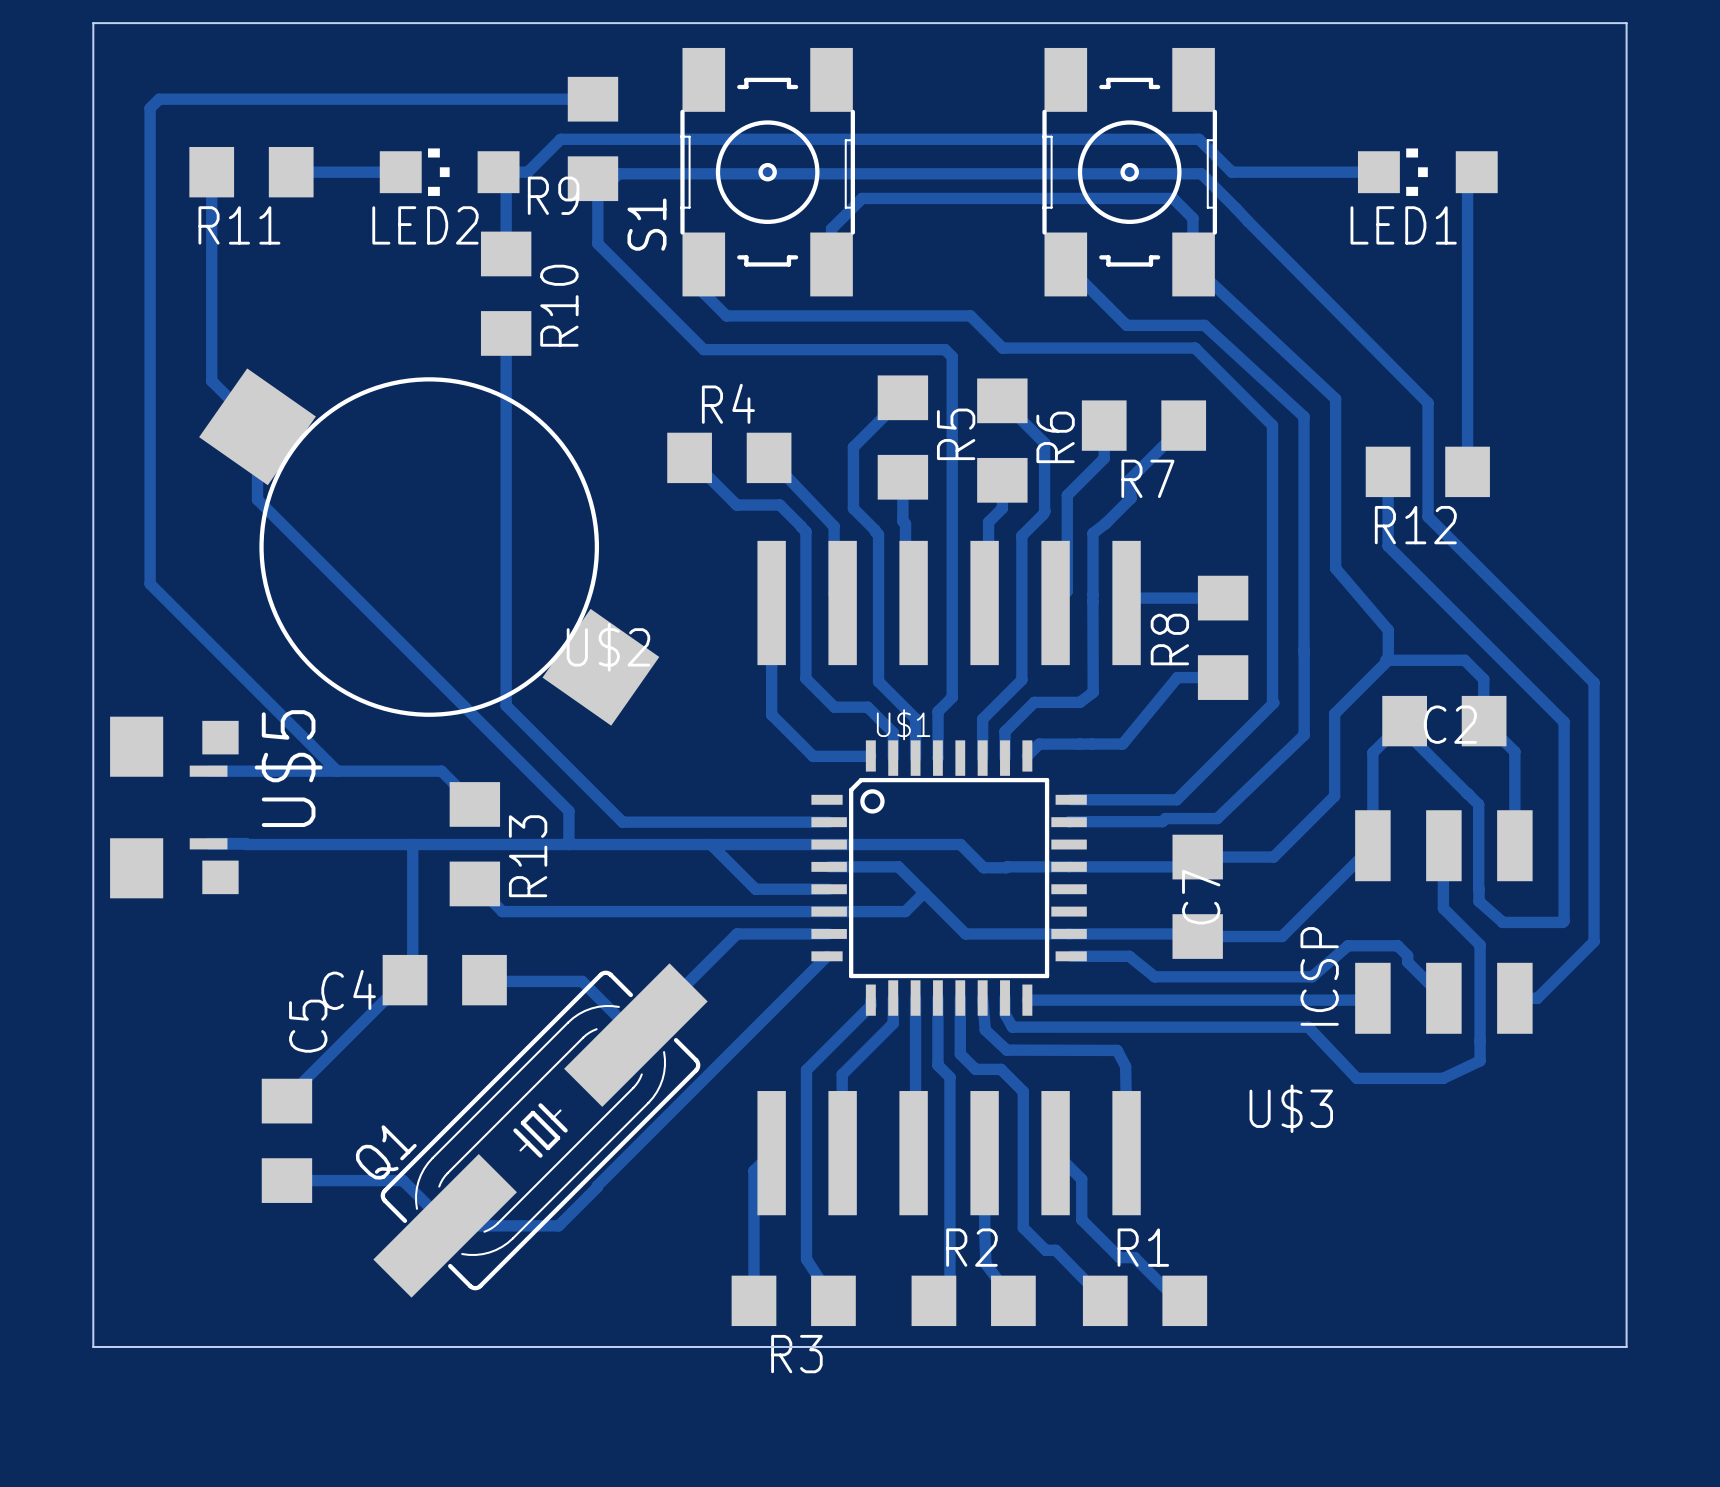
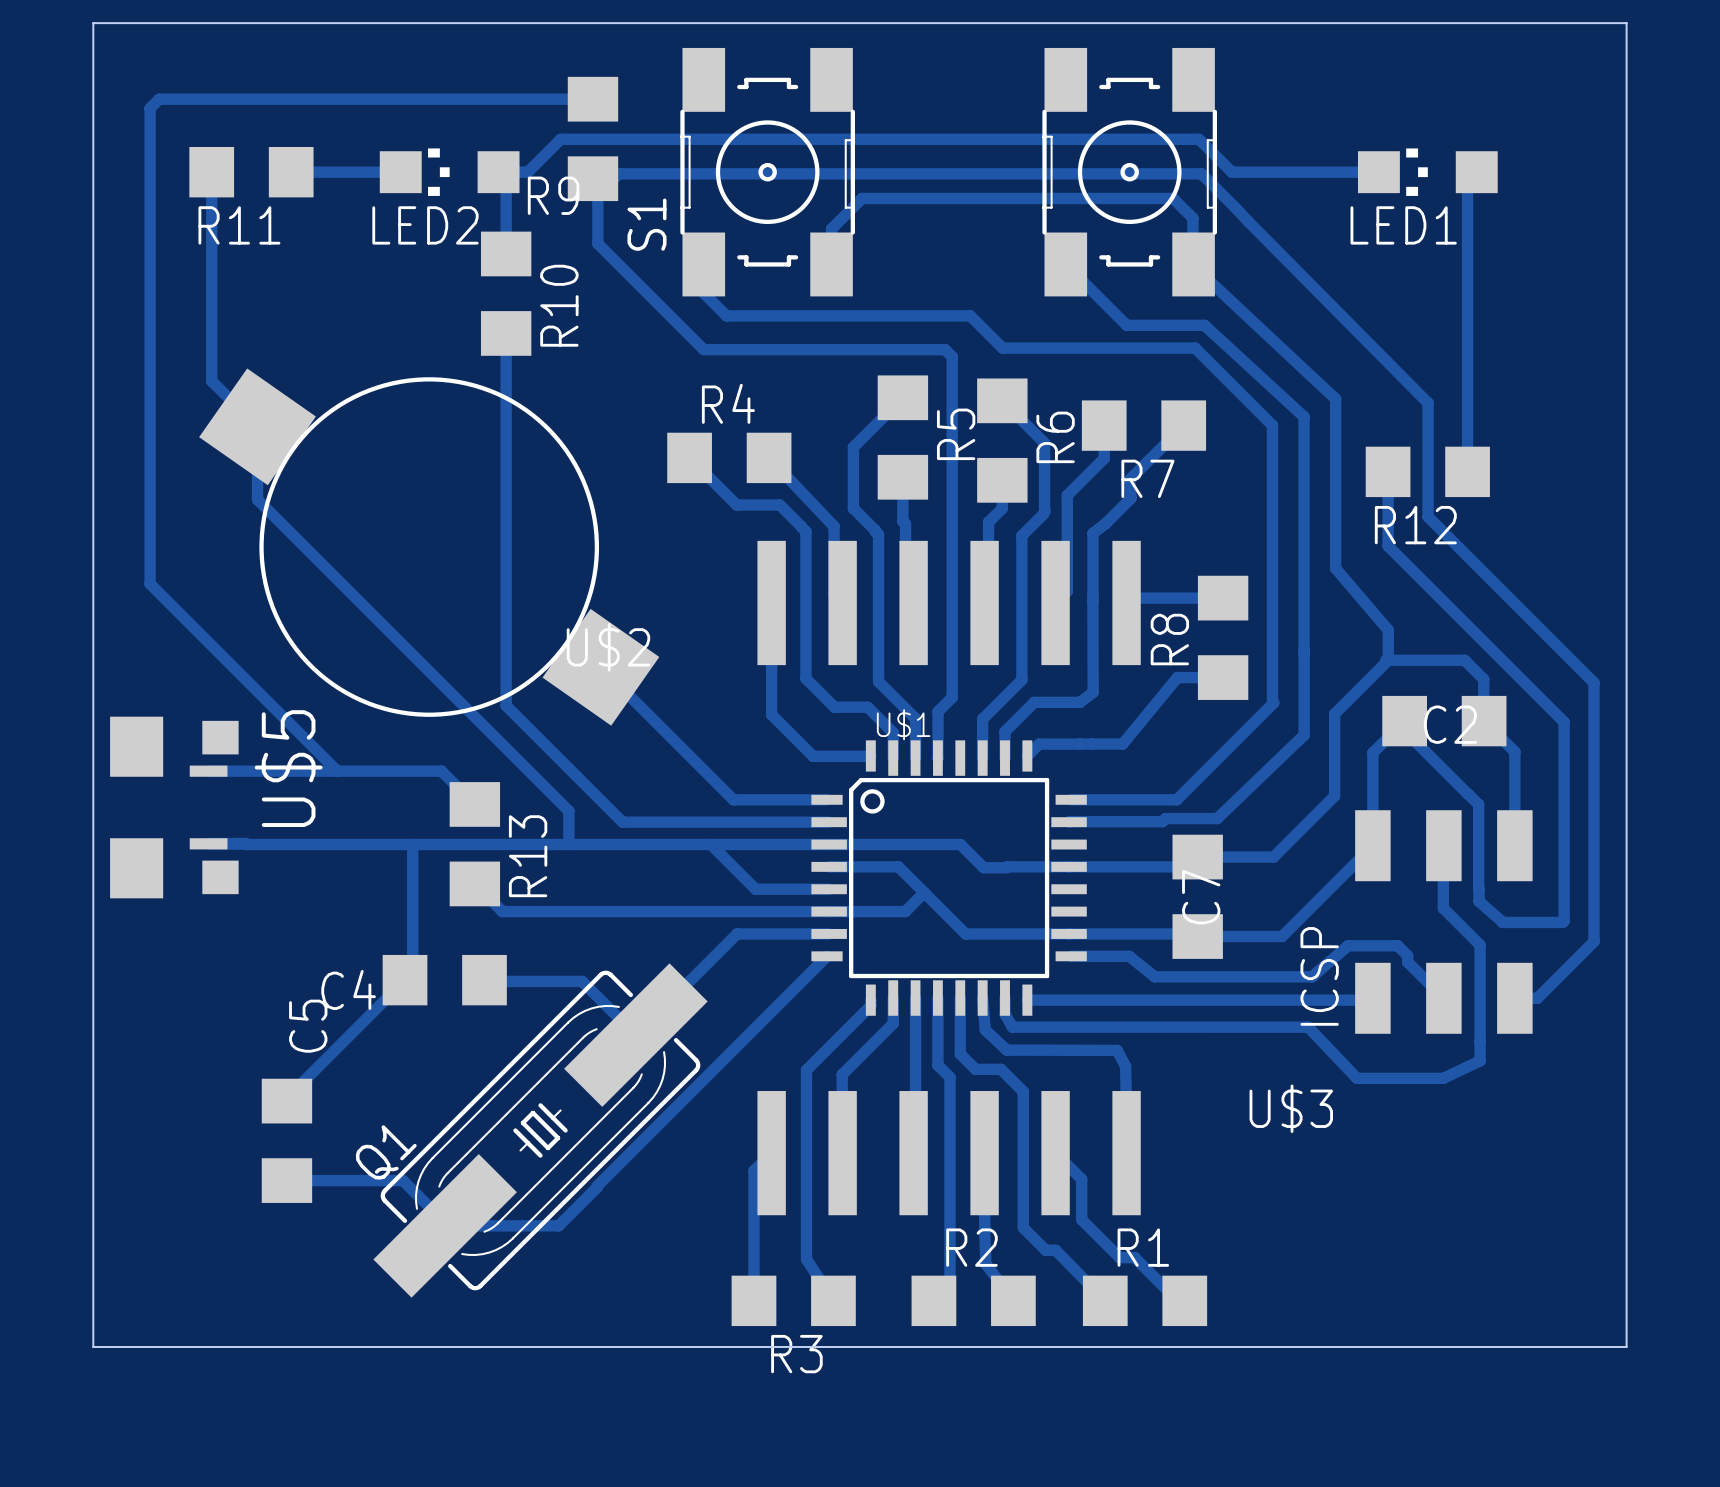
track: none -> (600, 667) (733, 799) (827, 799)

